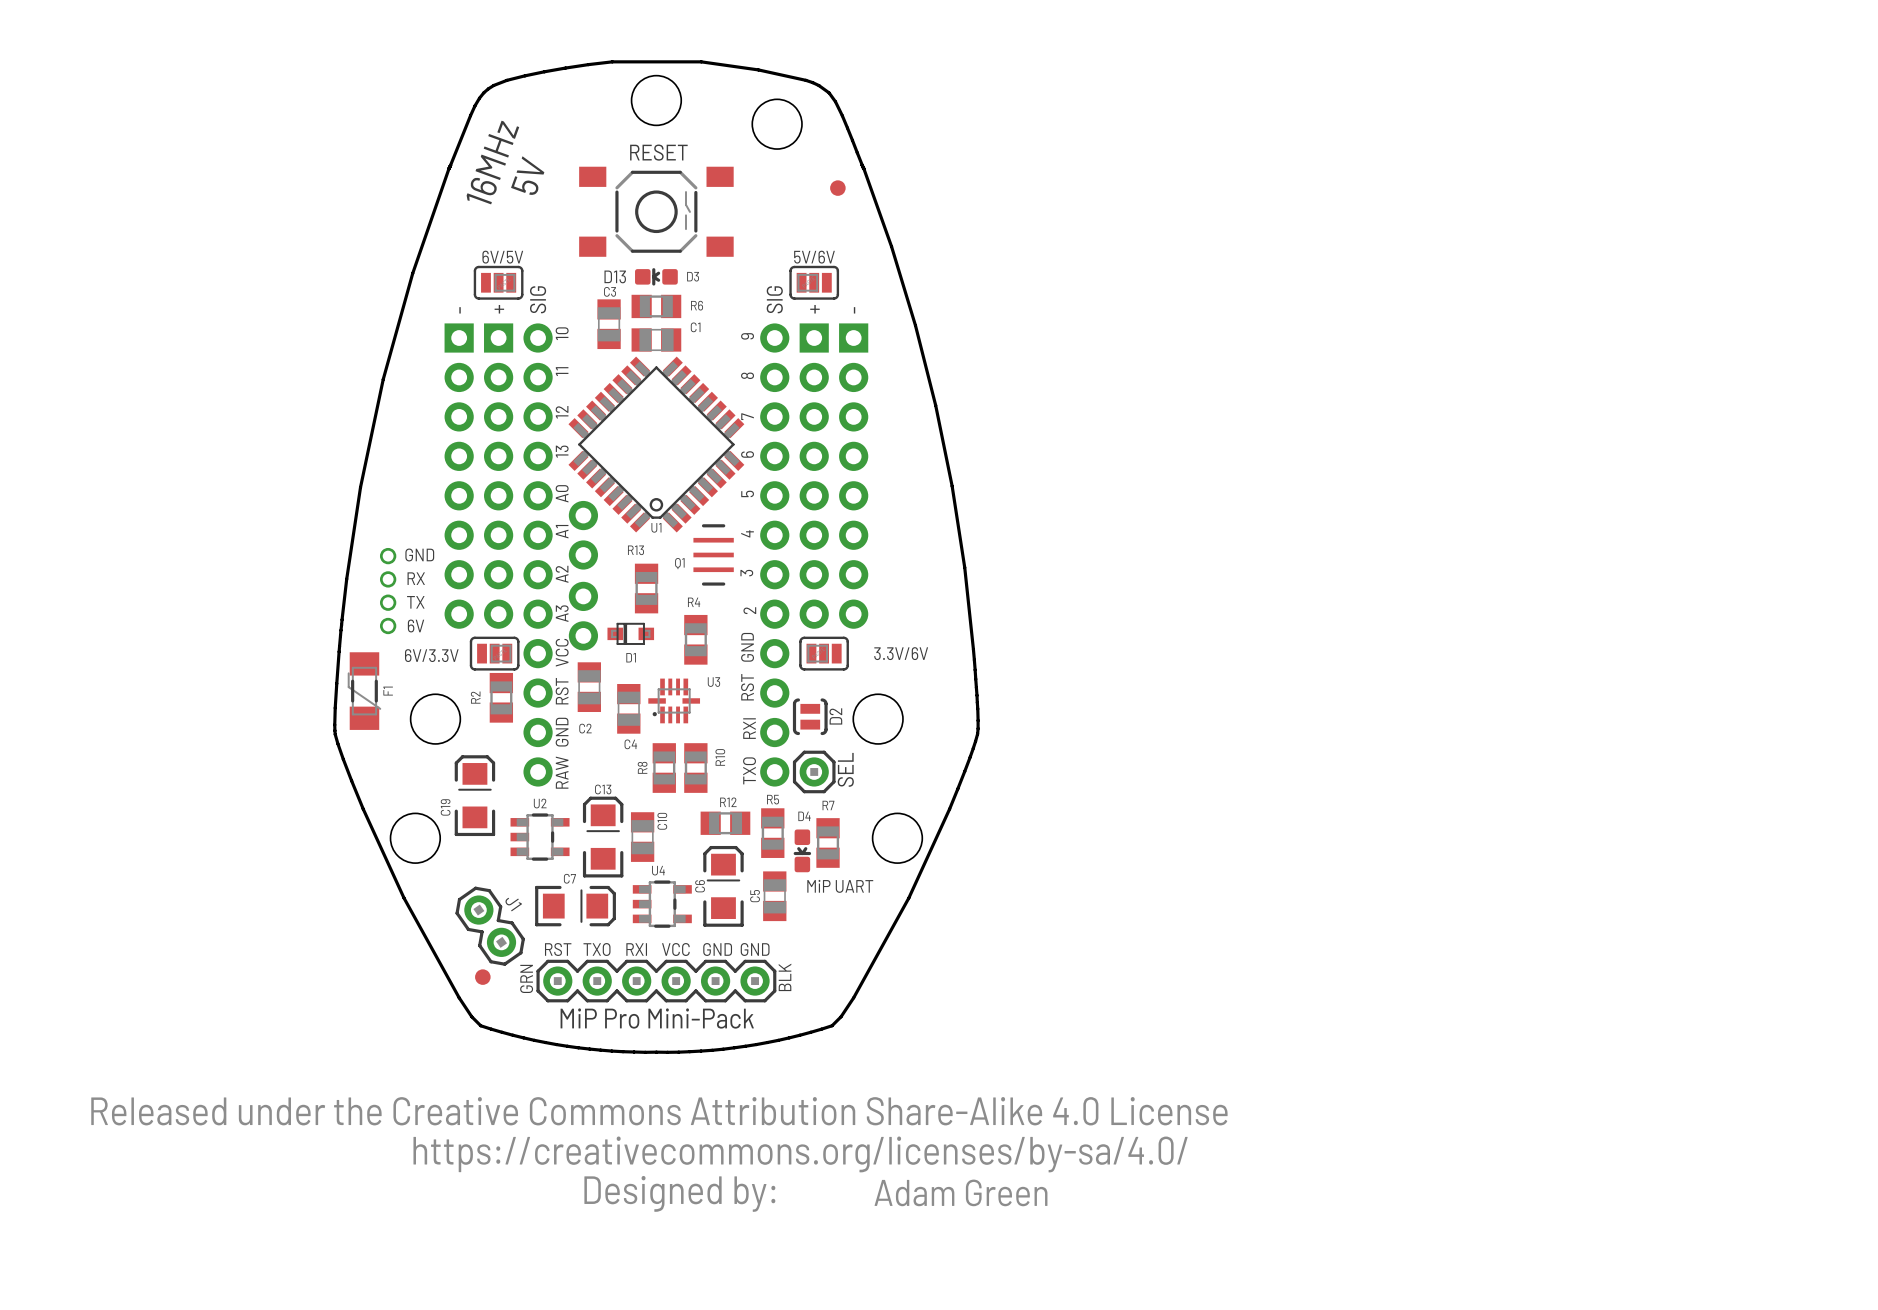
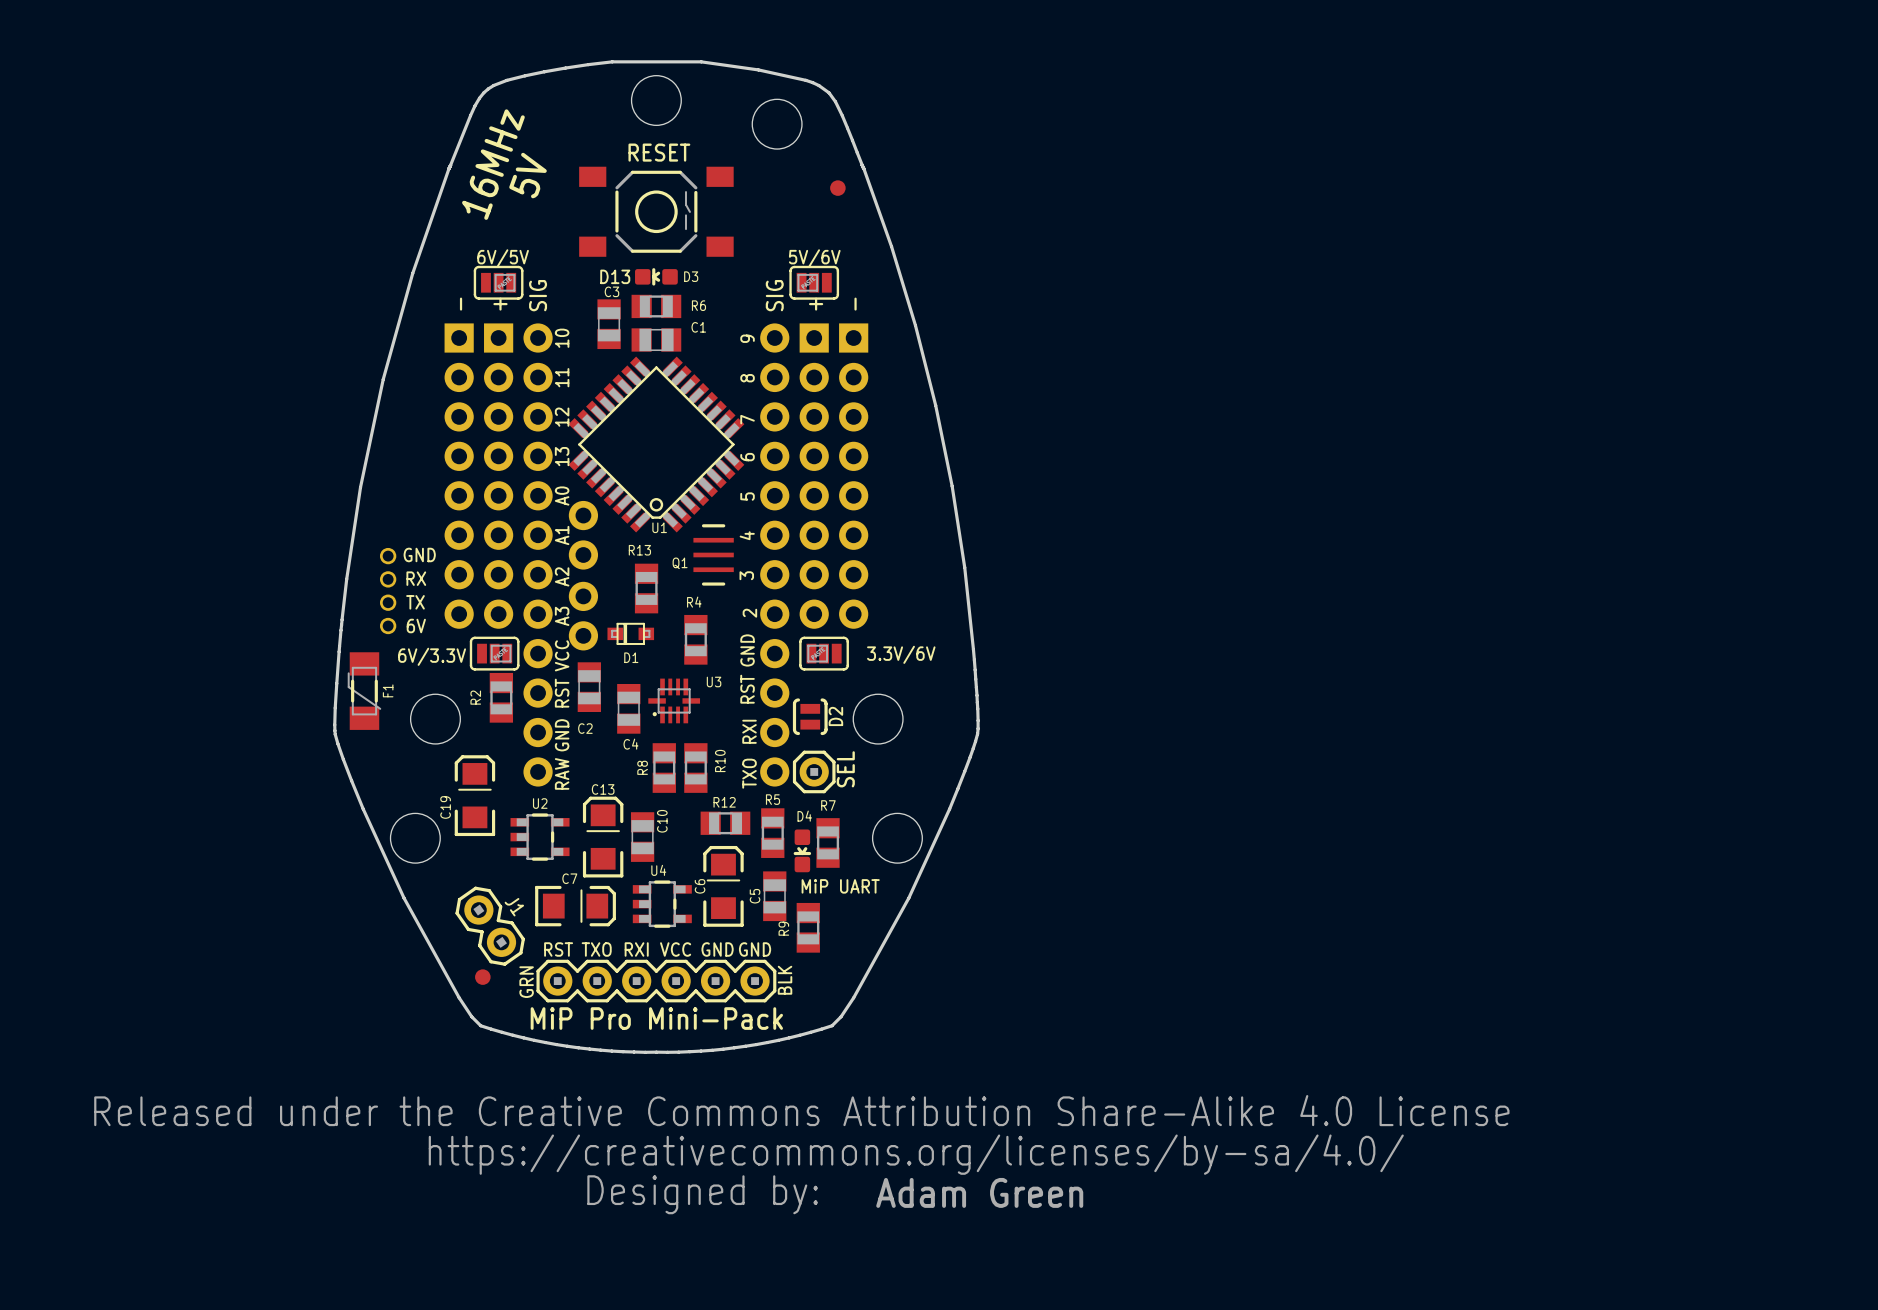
R9: none -> (808, 927)

